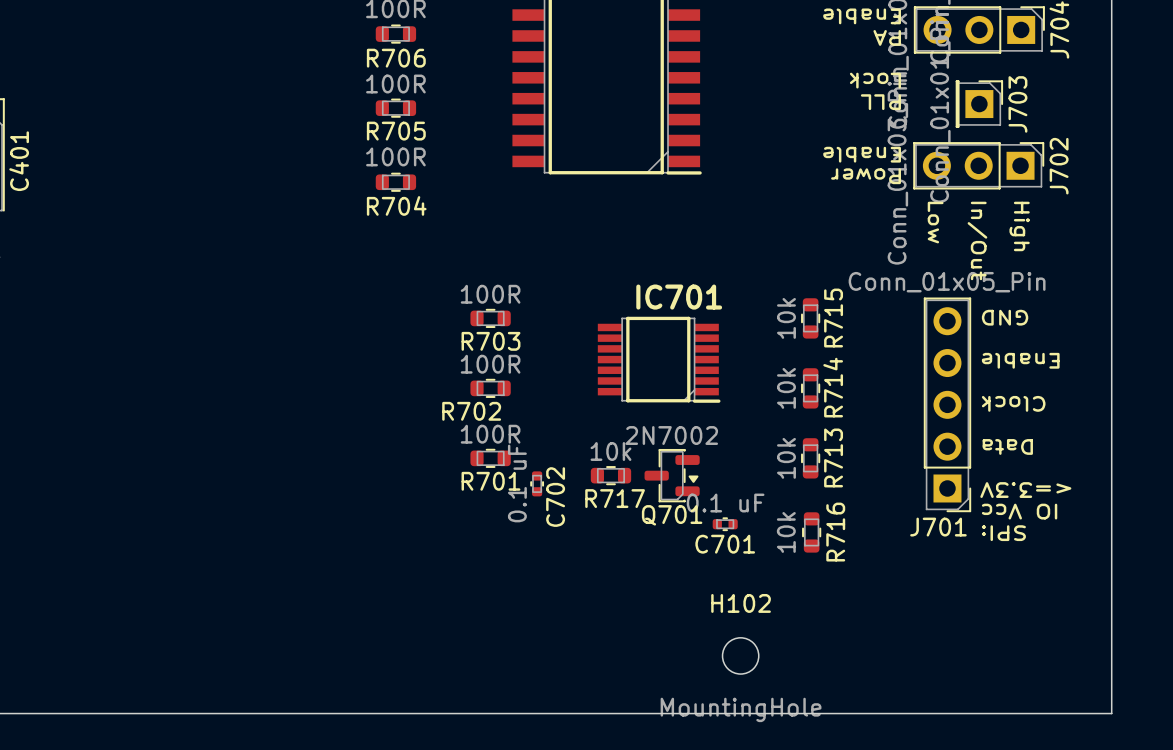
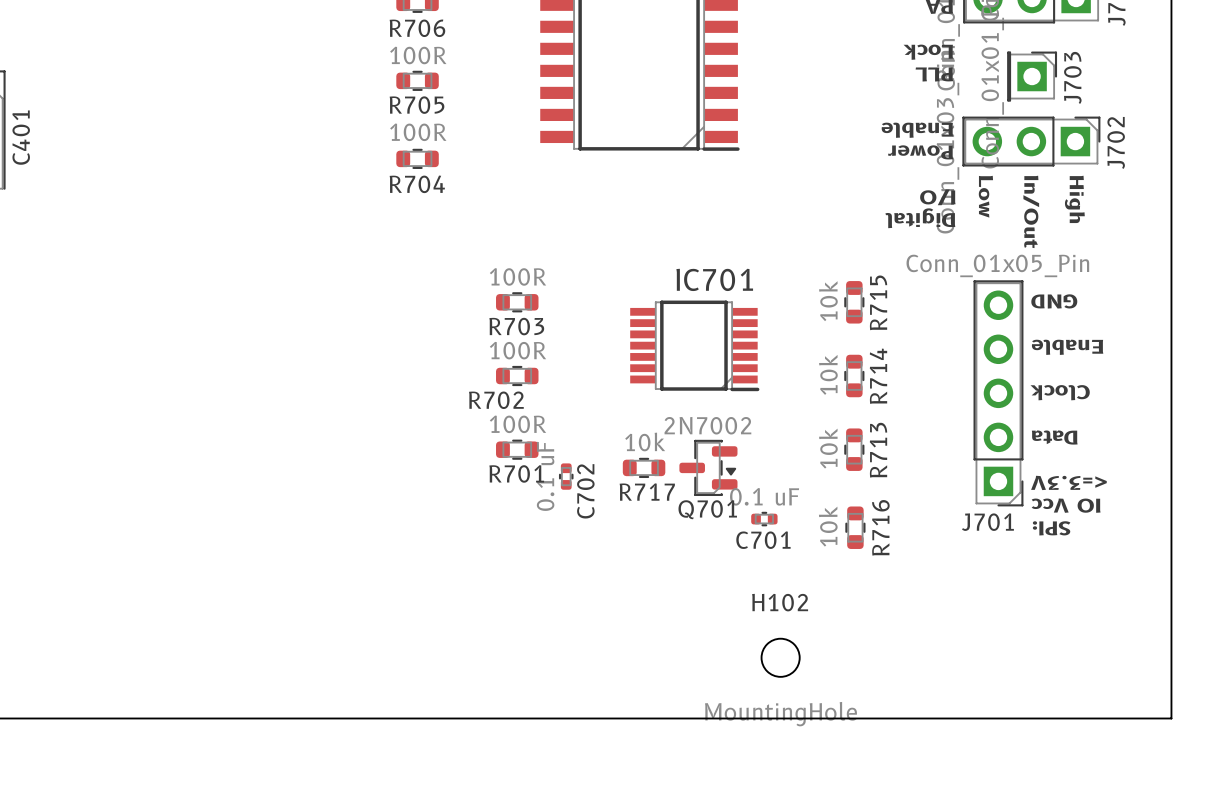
text: none -> I/O (937, 197)
text: none -> Digital (920, 218)

